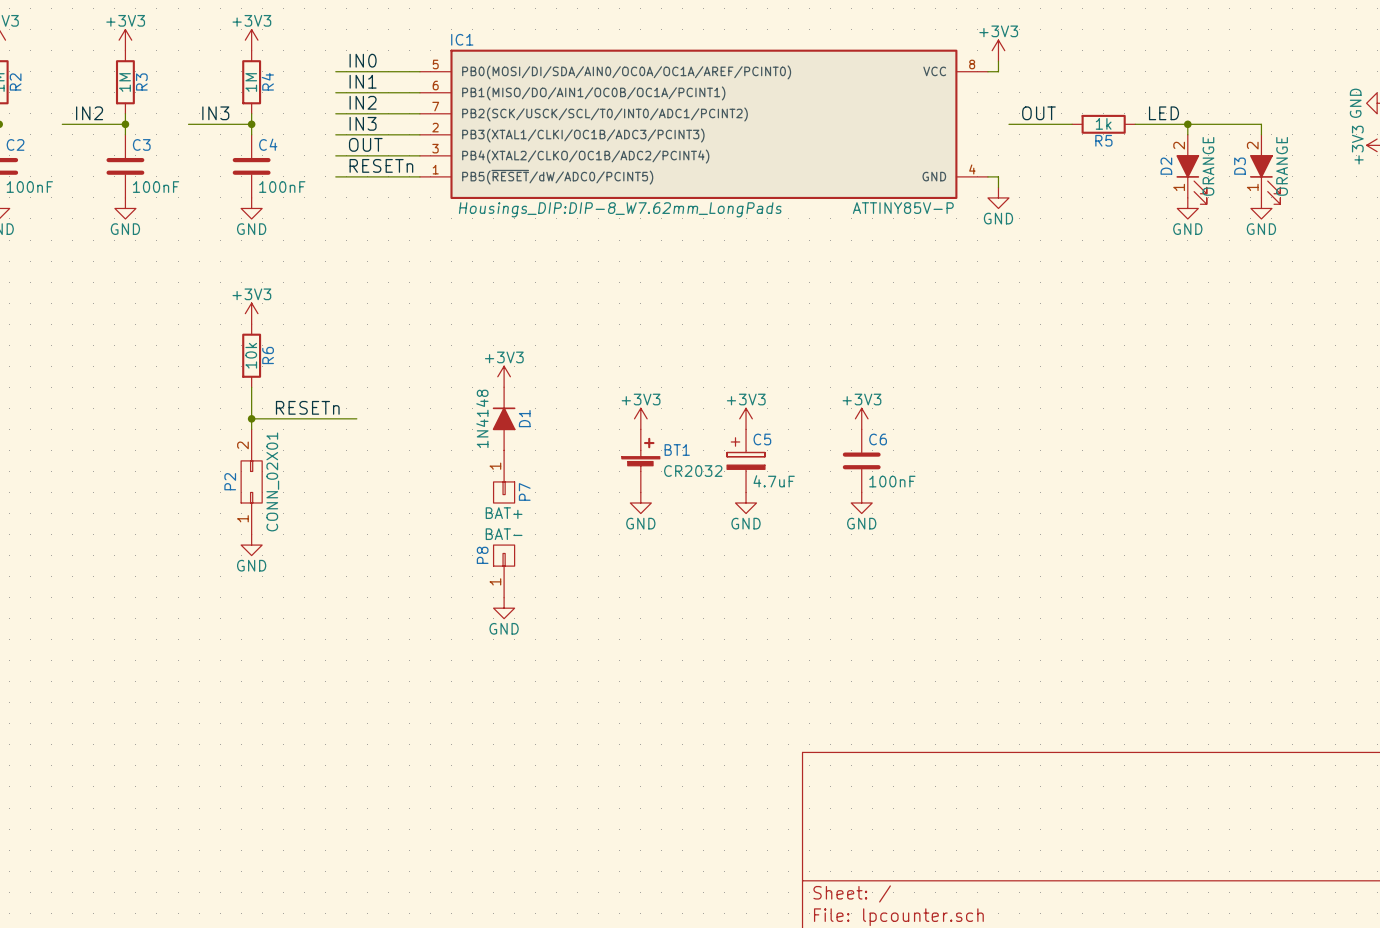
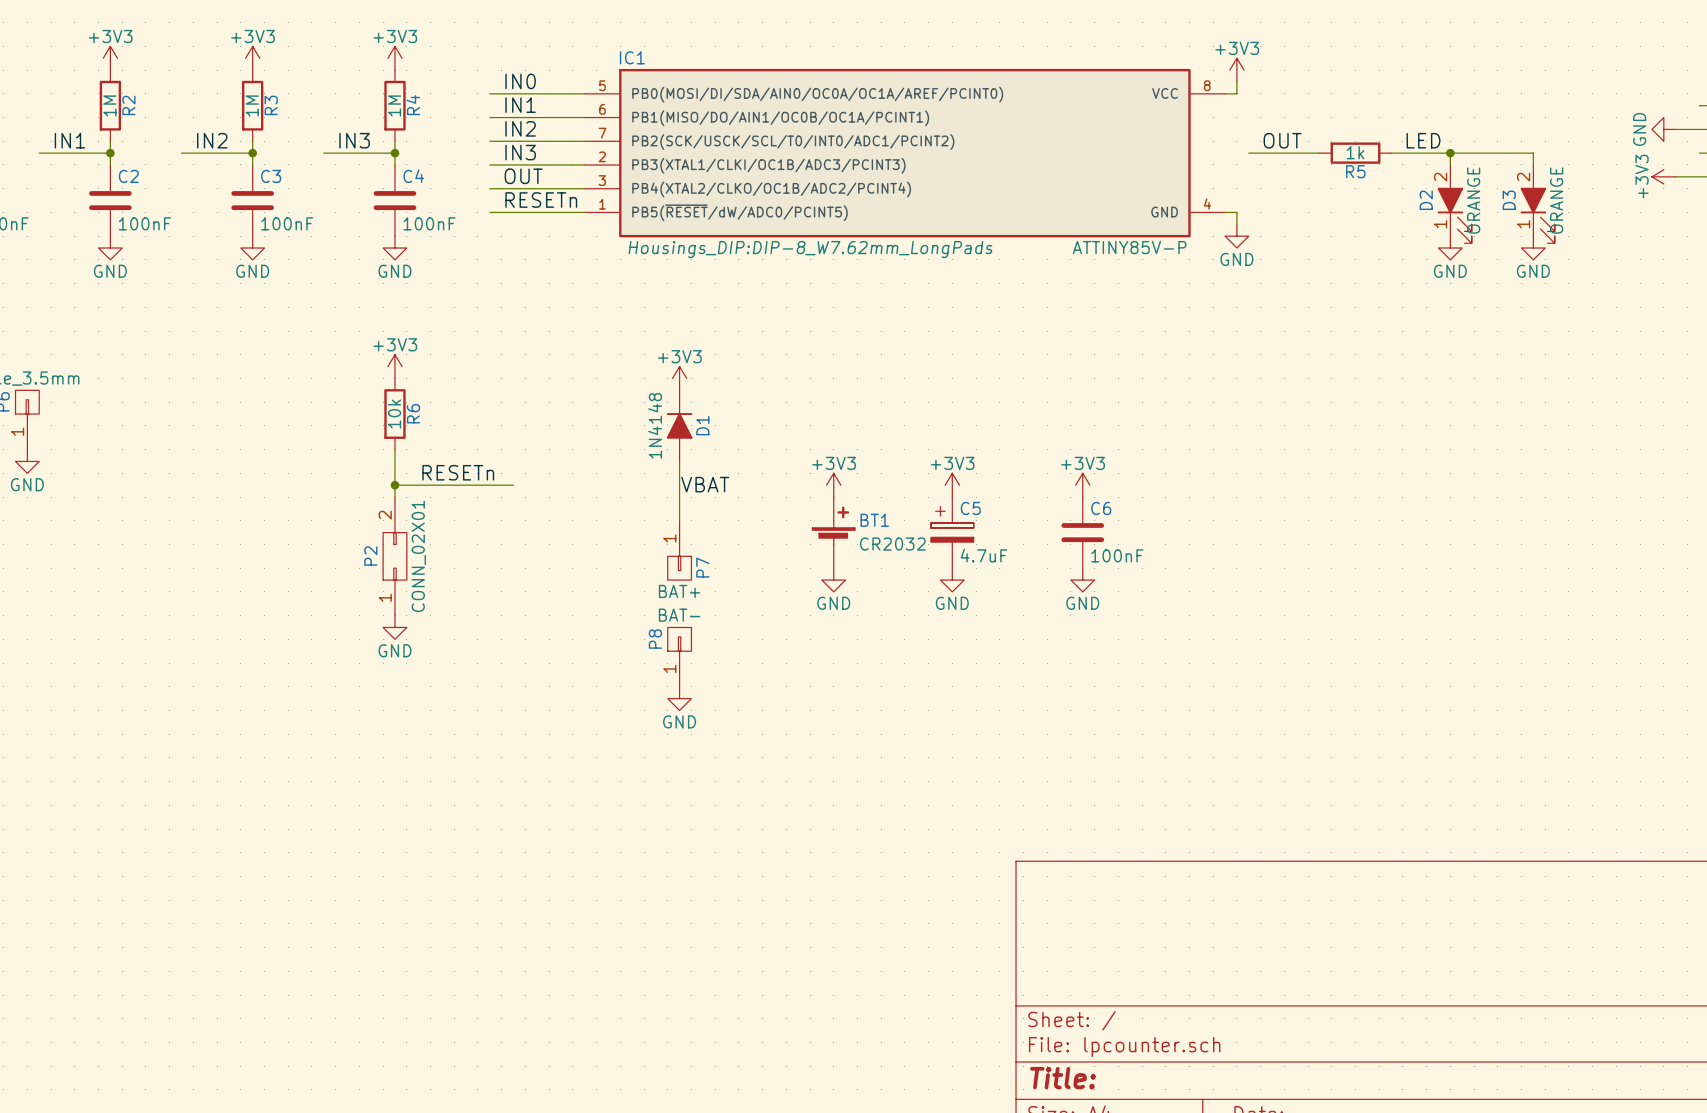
power symbol position: +3V3 (504, 376) -> +3V3 (679, 378)
D1 position: (504, 418) -> (679, 425)
label: none -> VBAT (705, 484)

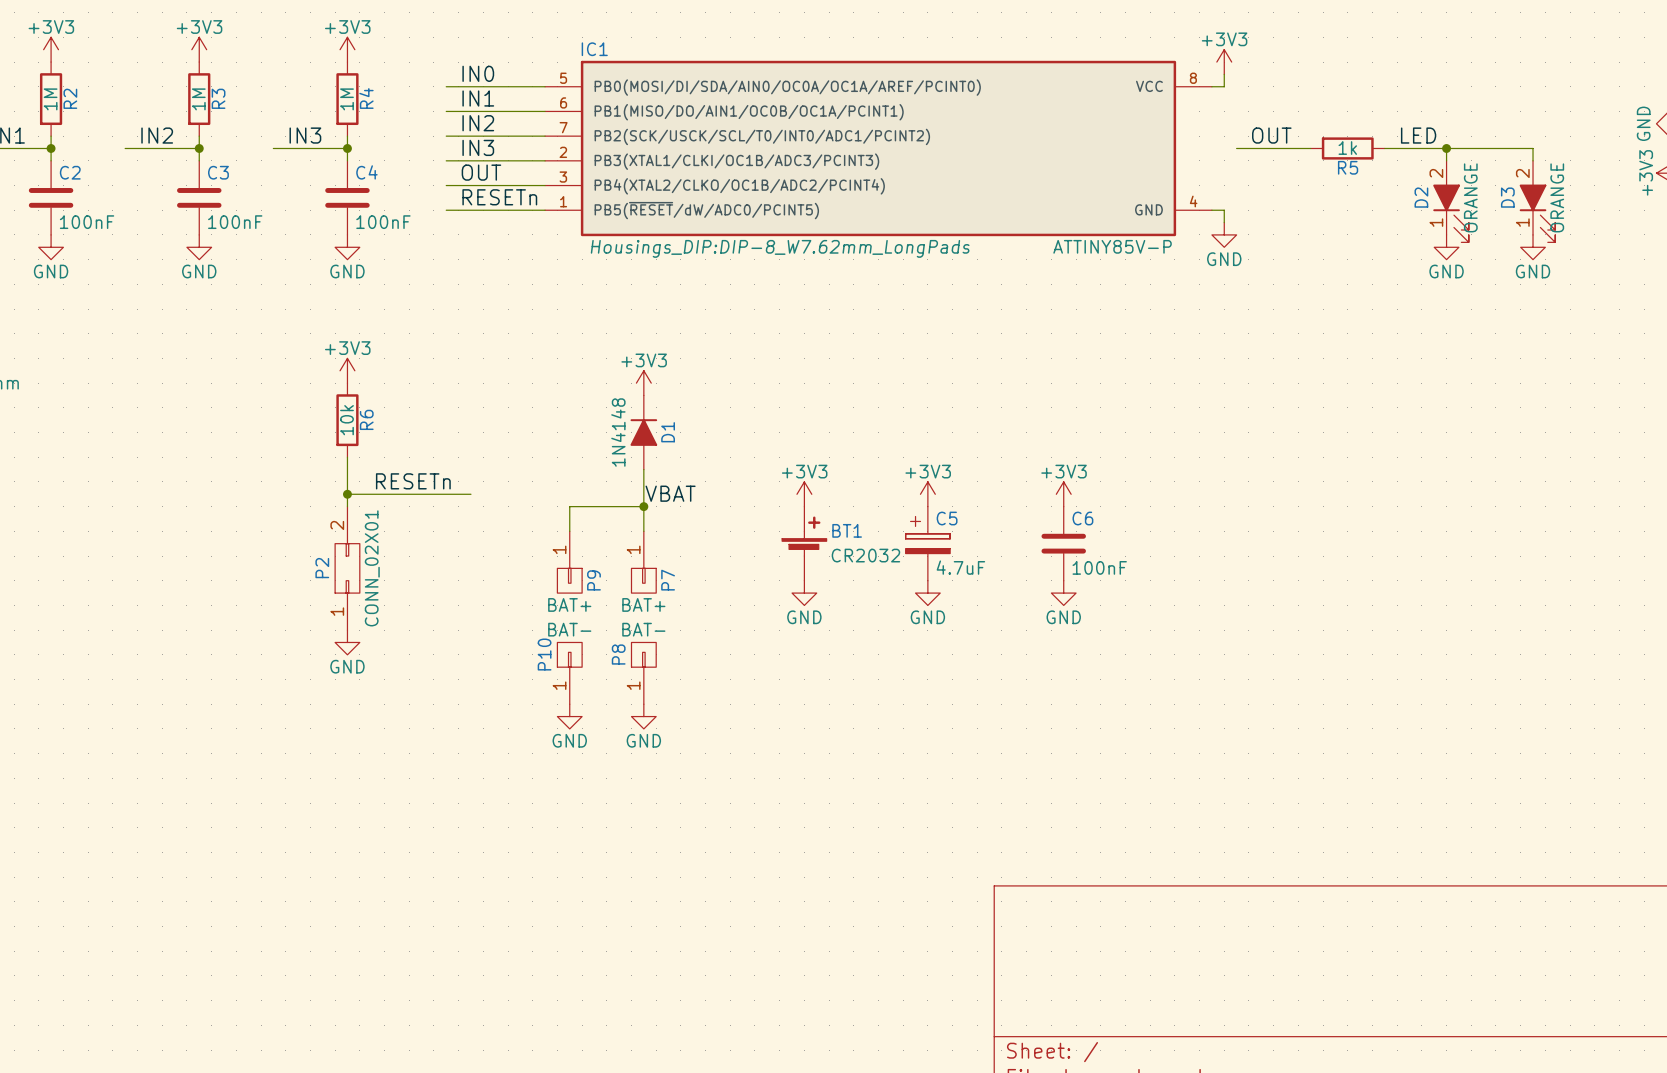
wire: none -> (643, 506) (569, 506) (569, 531)
junction: none -> (643, 506)
P9: none -> BAT+ (569, 562)
P10: none -> BAT- (569, 673)
power symbol: none -> GND (569, 716)

